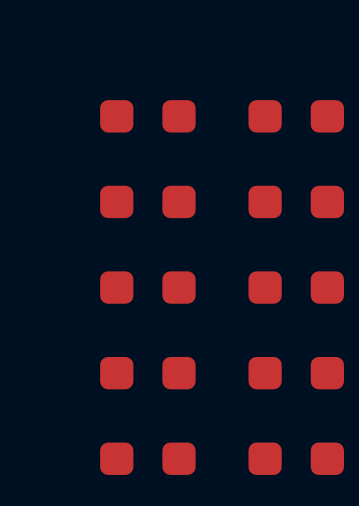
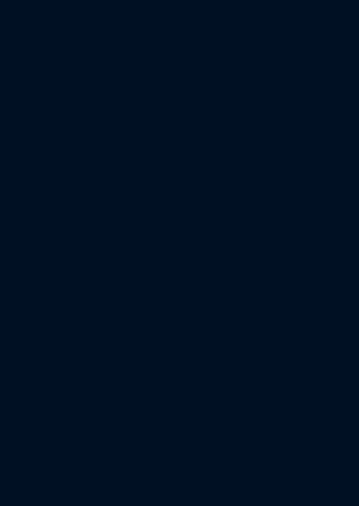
part: (147, 116) -> none
part: (296, 116) -> none
part: (147, 201) -> none
part: (296, 201) -> none
part: (147, 287) -> none
part: (296, 287) -> none
part: (147, 373) -> none
part: (296, 373) -> none
part: (147, 458) -> none
part: (296, 458) -> none

